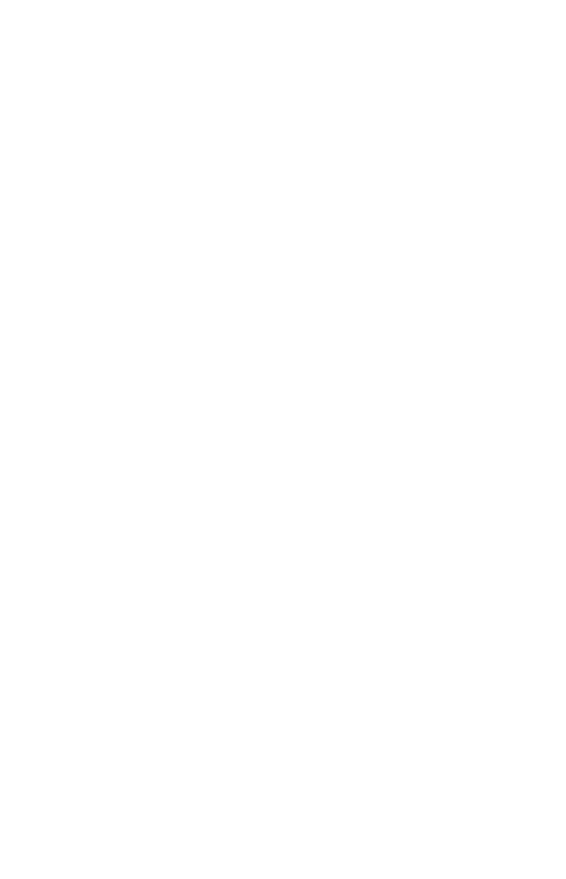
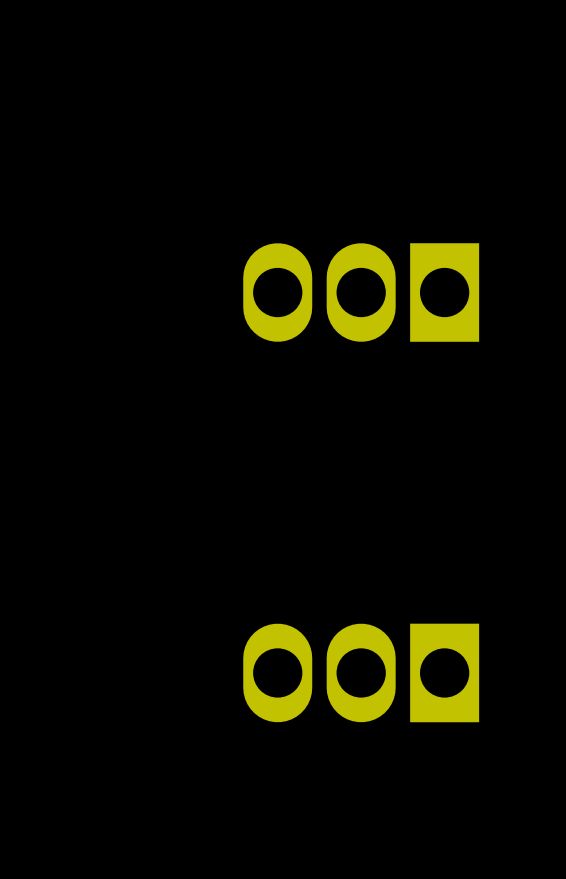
part: none -> (361, 292)
part: none -> (361, 672)

